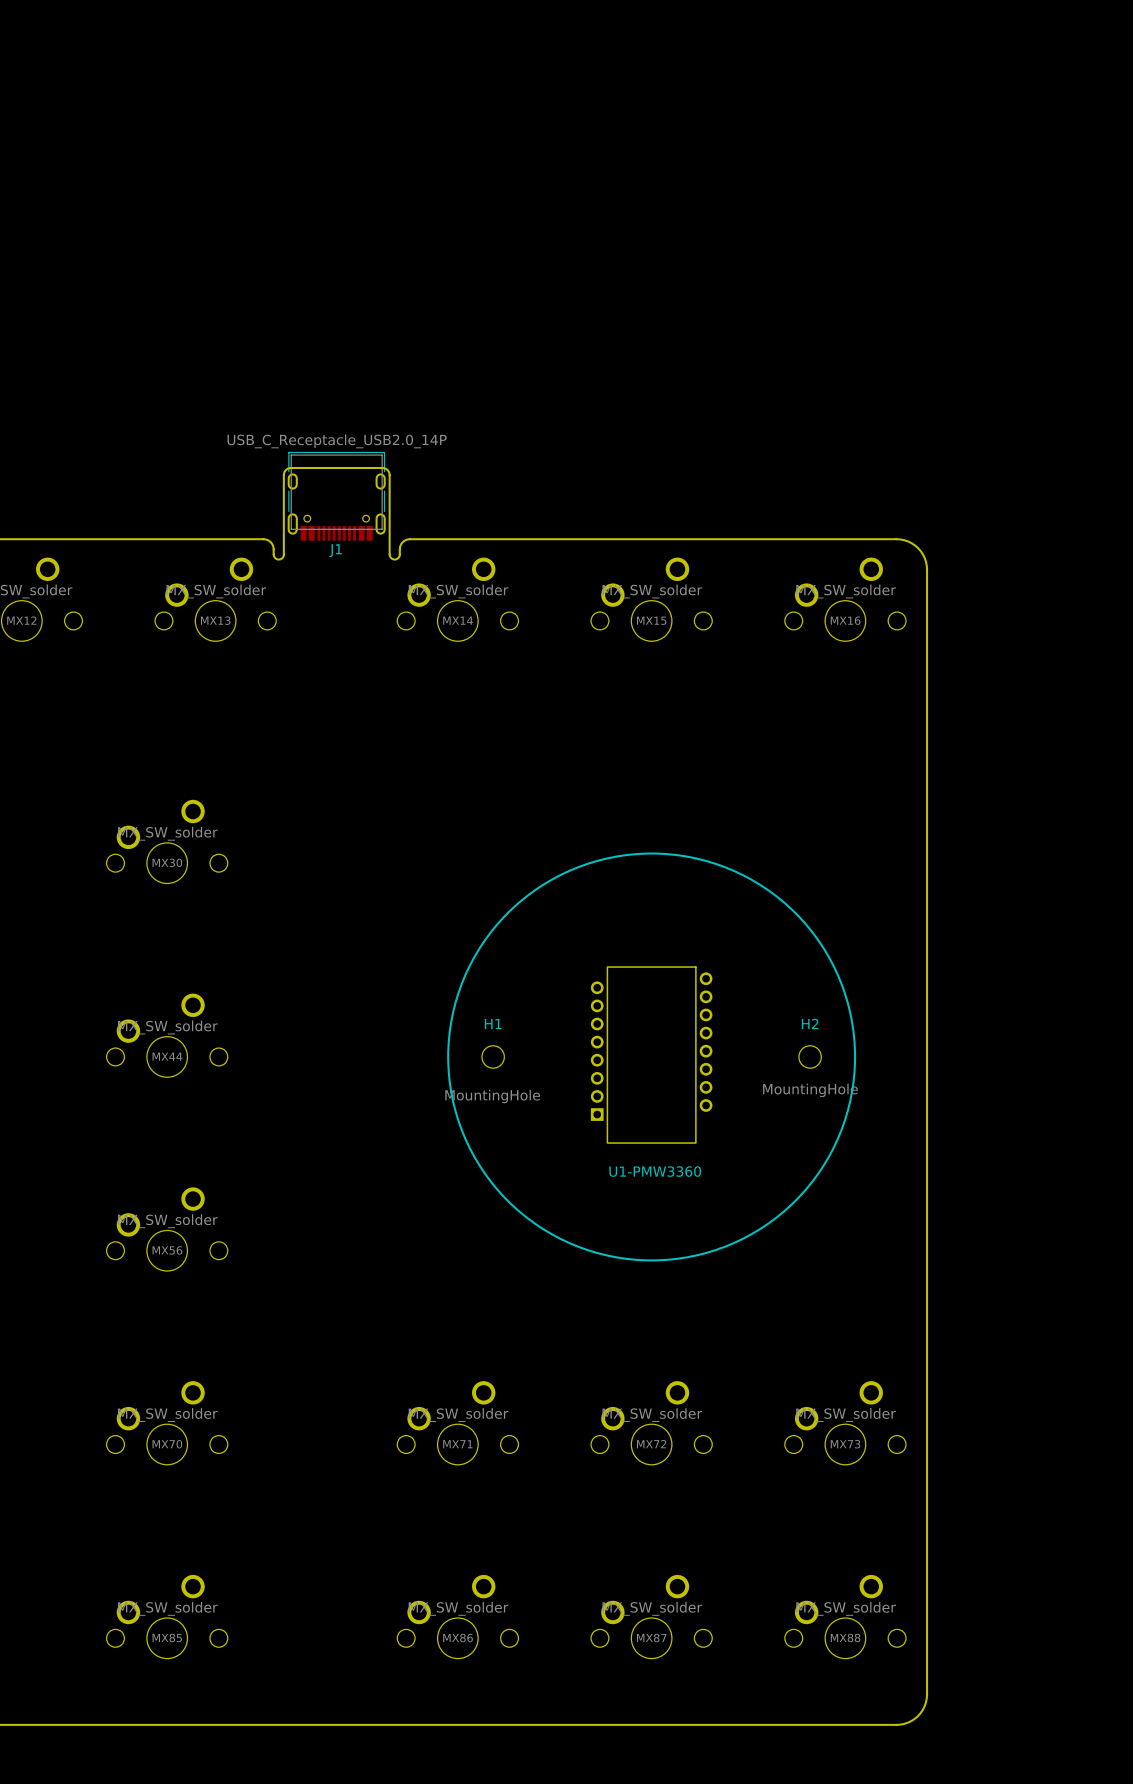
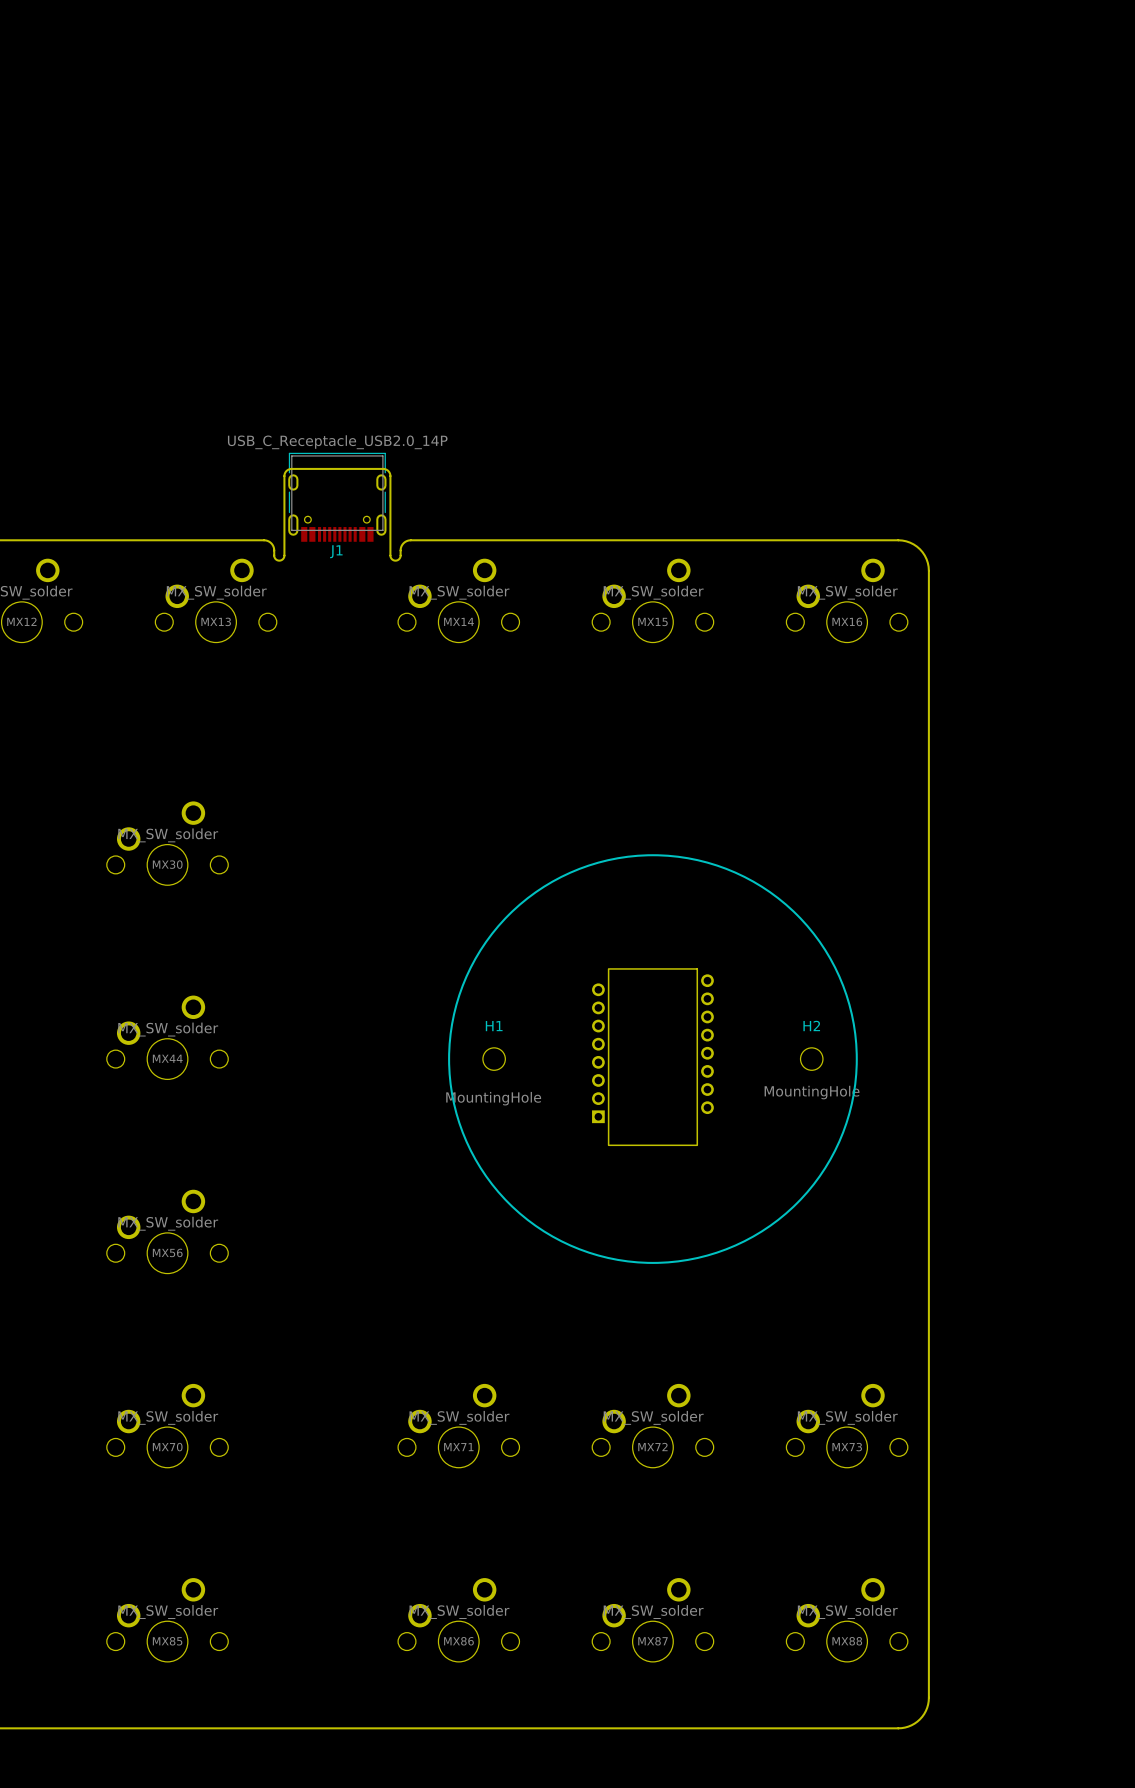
U1-PMW3360 name: U1-PMW3360 (655, 1171) -> none

